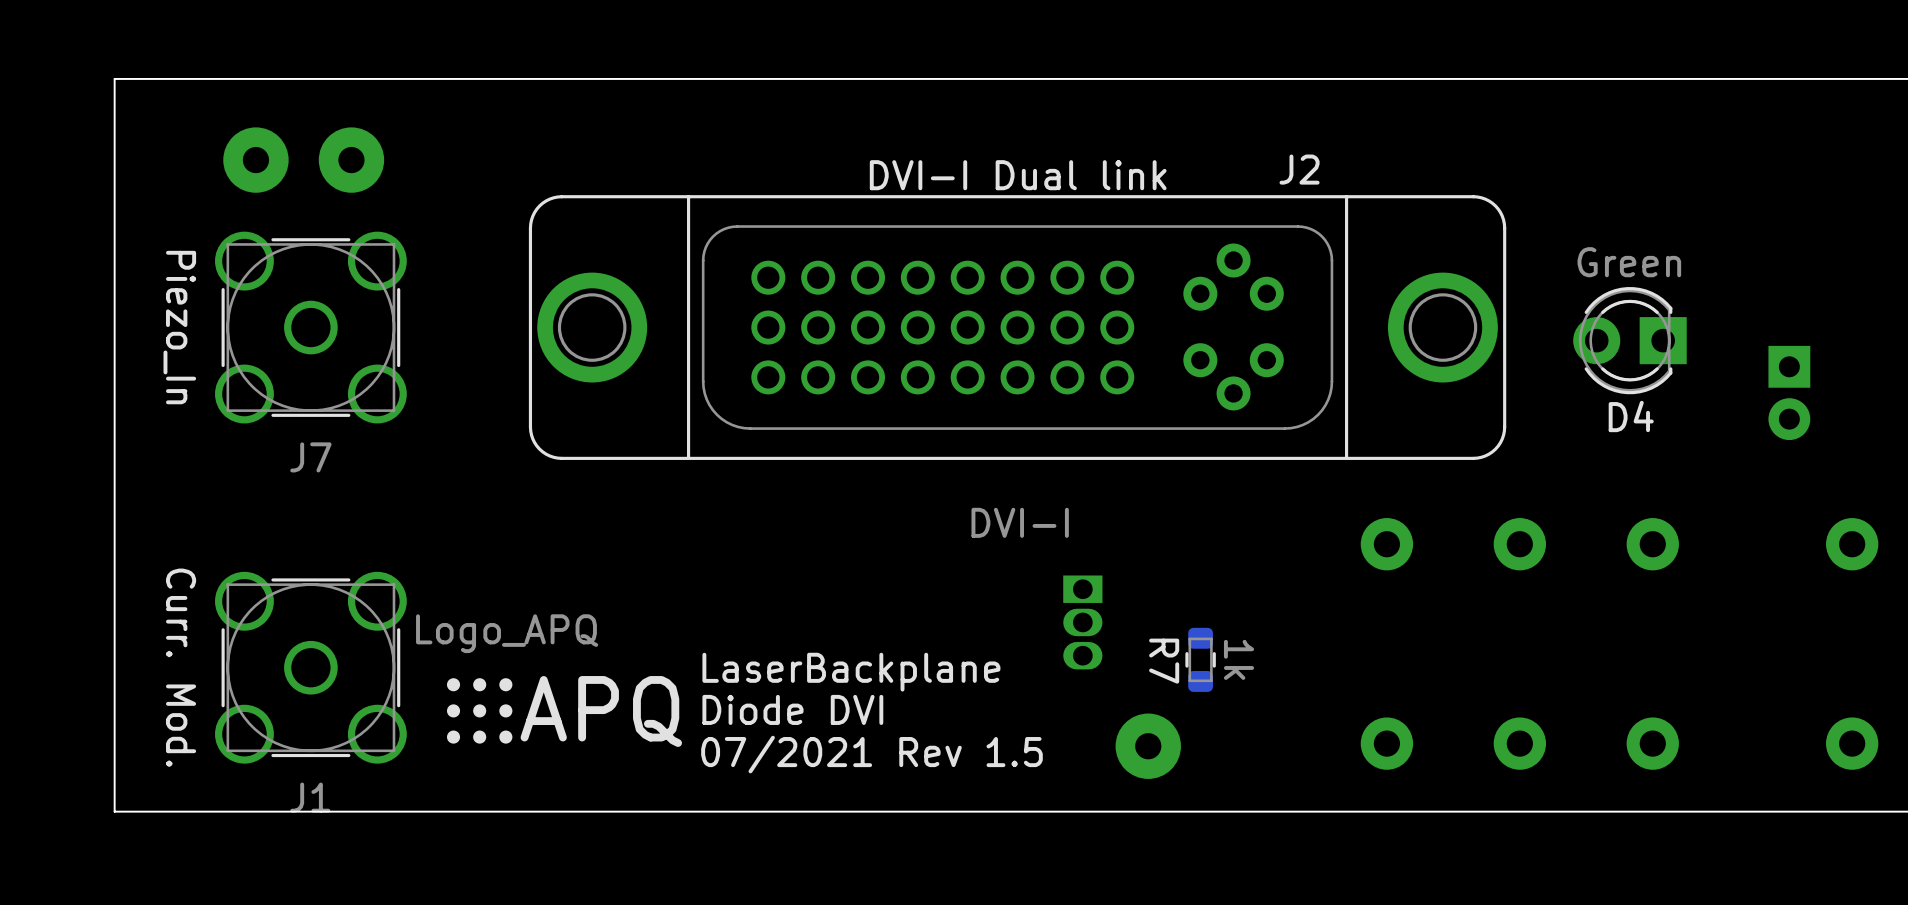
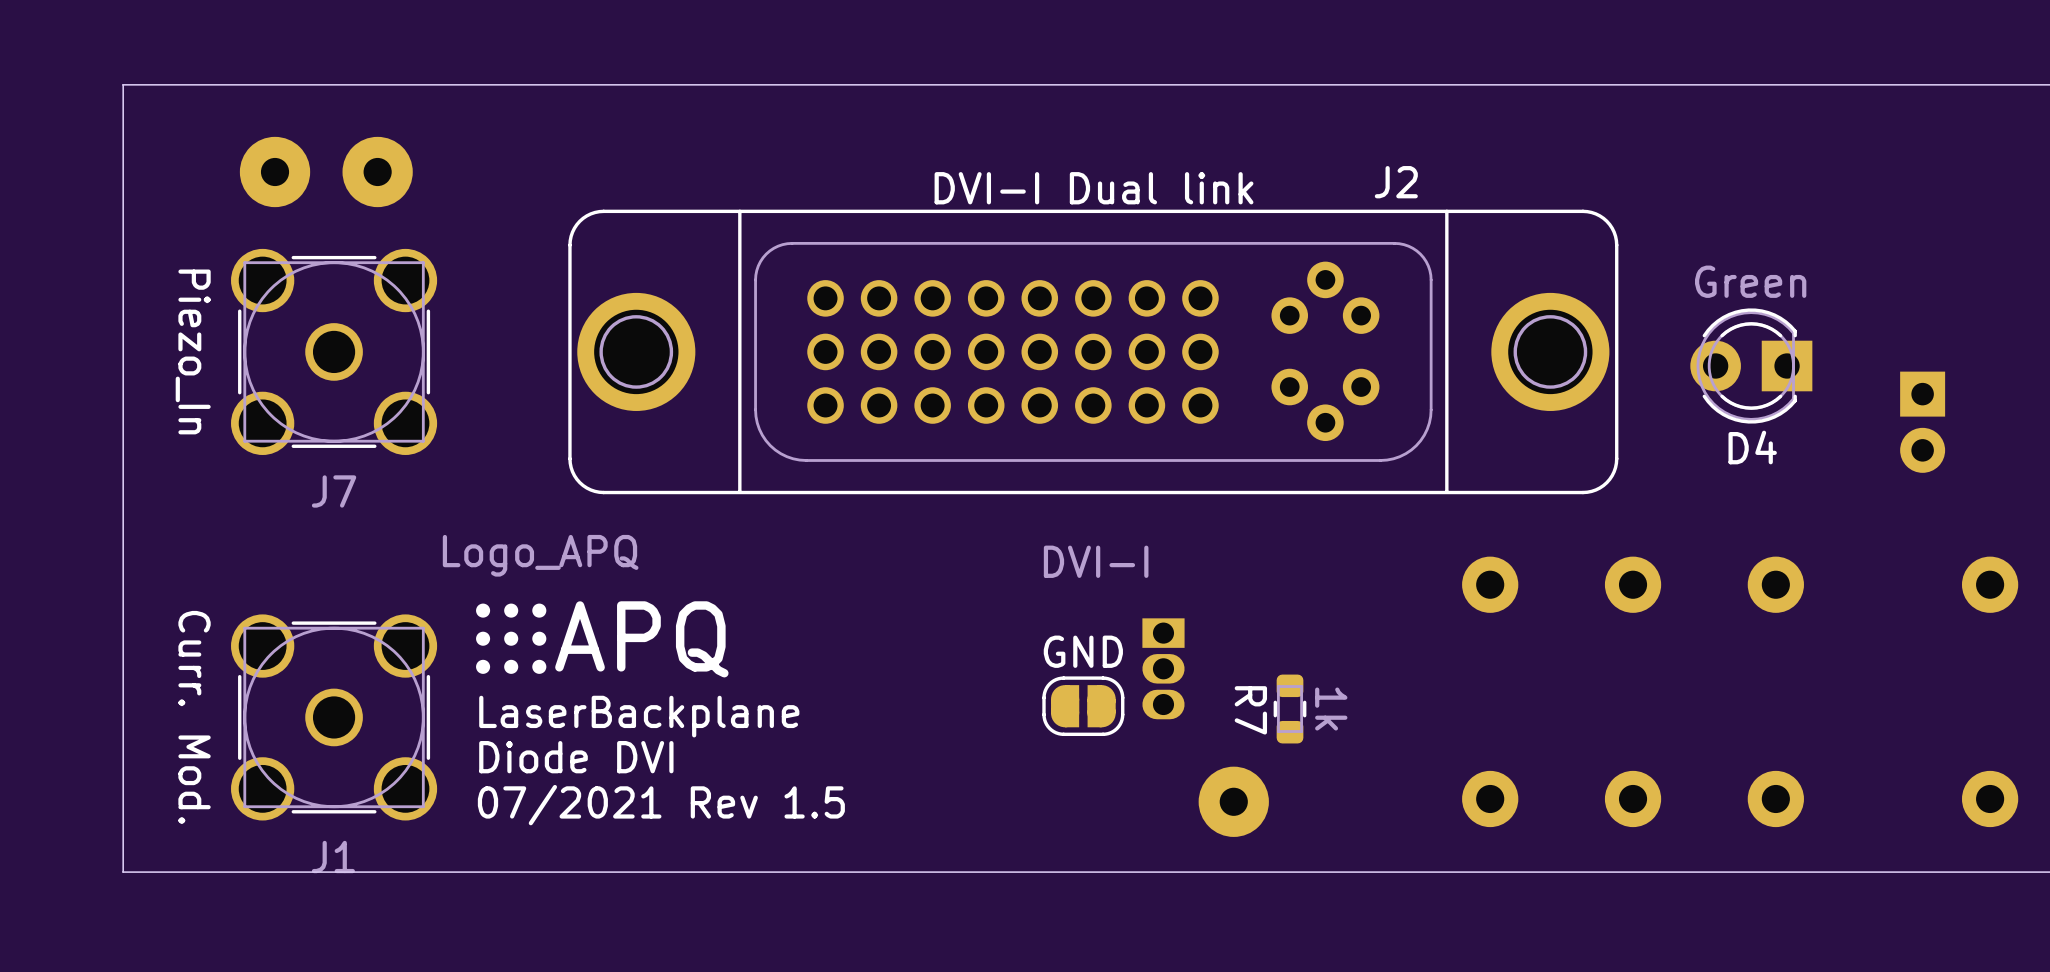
part: none -> GND (1083, 706)
text position: LaserBackplane (851, 672) -> LaserBackplane (639, 716)
text position: Diode DVI (792, 709) -> Diode DVI (576, 757)
drawing position: (479, 710) -> (511, 638)
text position: 07/2021 Rev 1.5 (871, 754) -> 07/2021 Rev 1.5 (661, 805)

